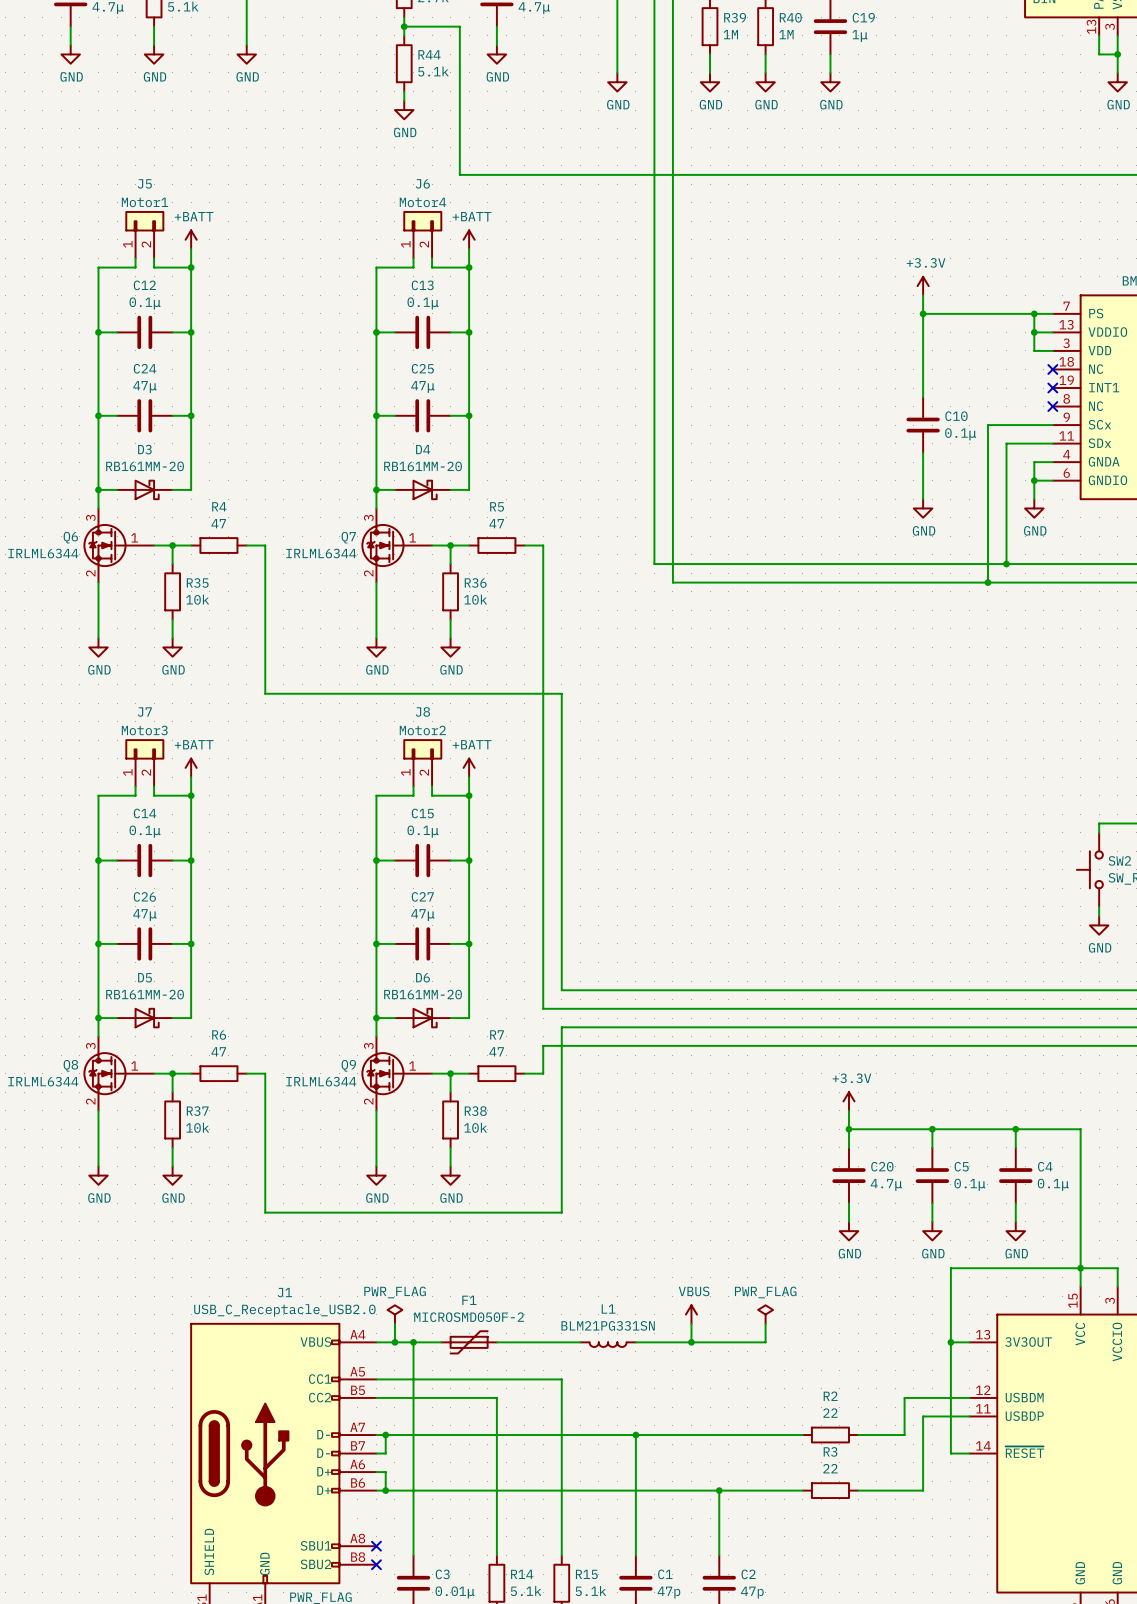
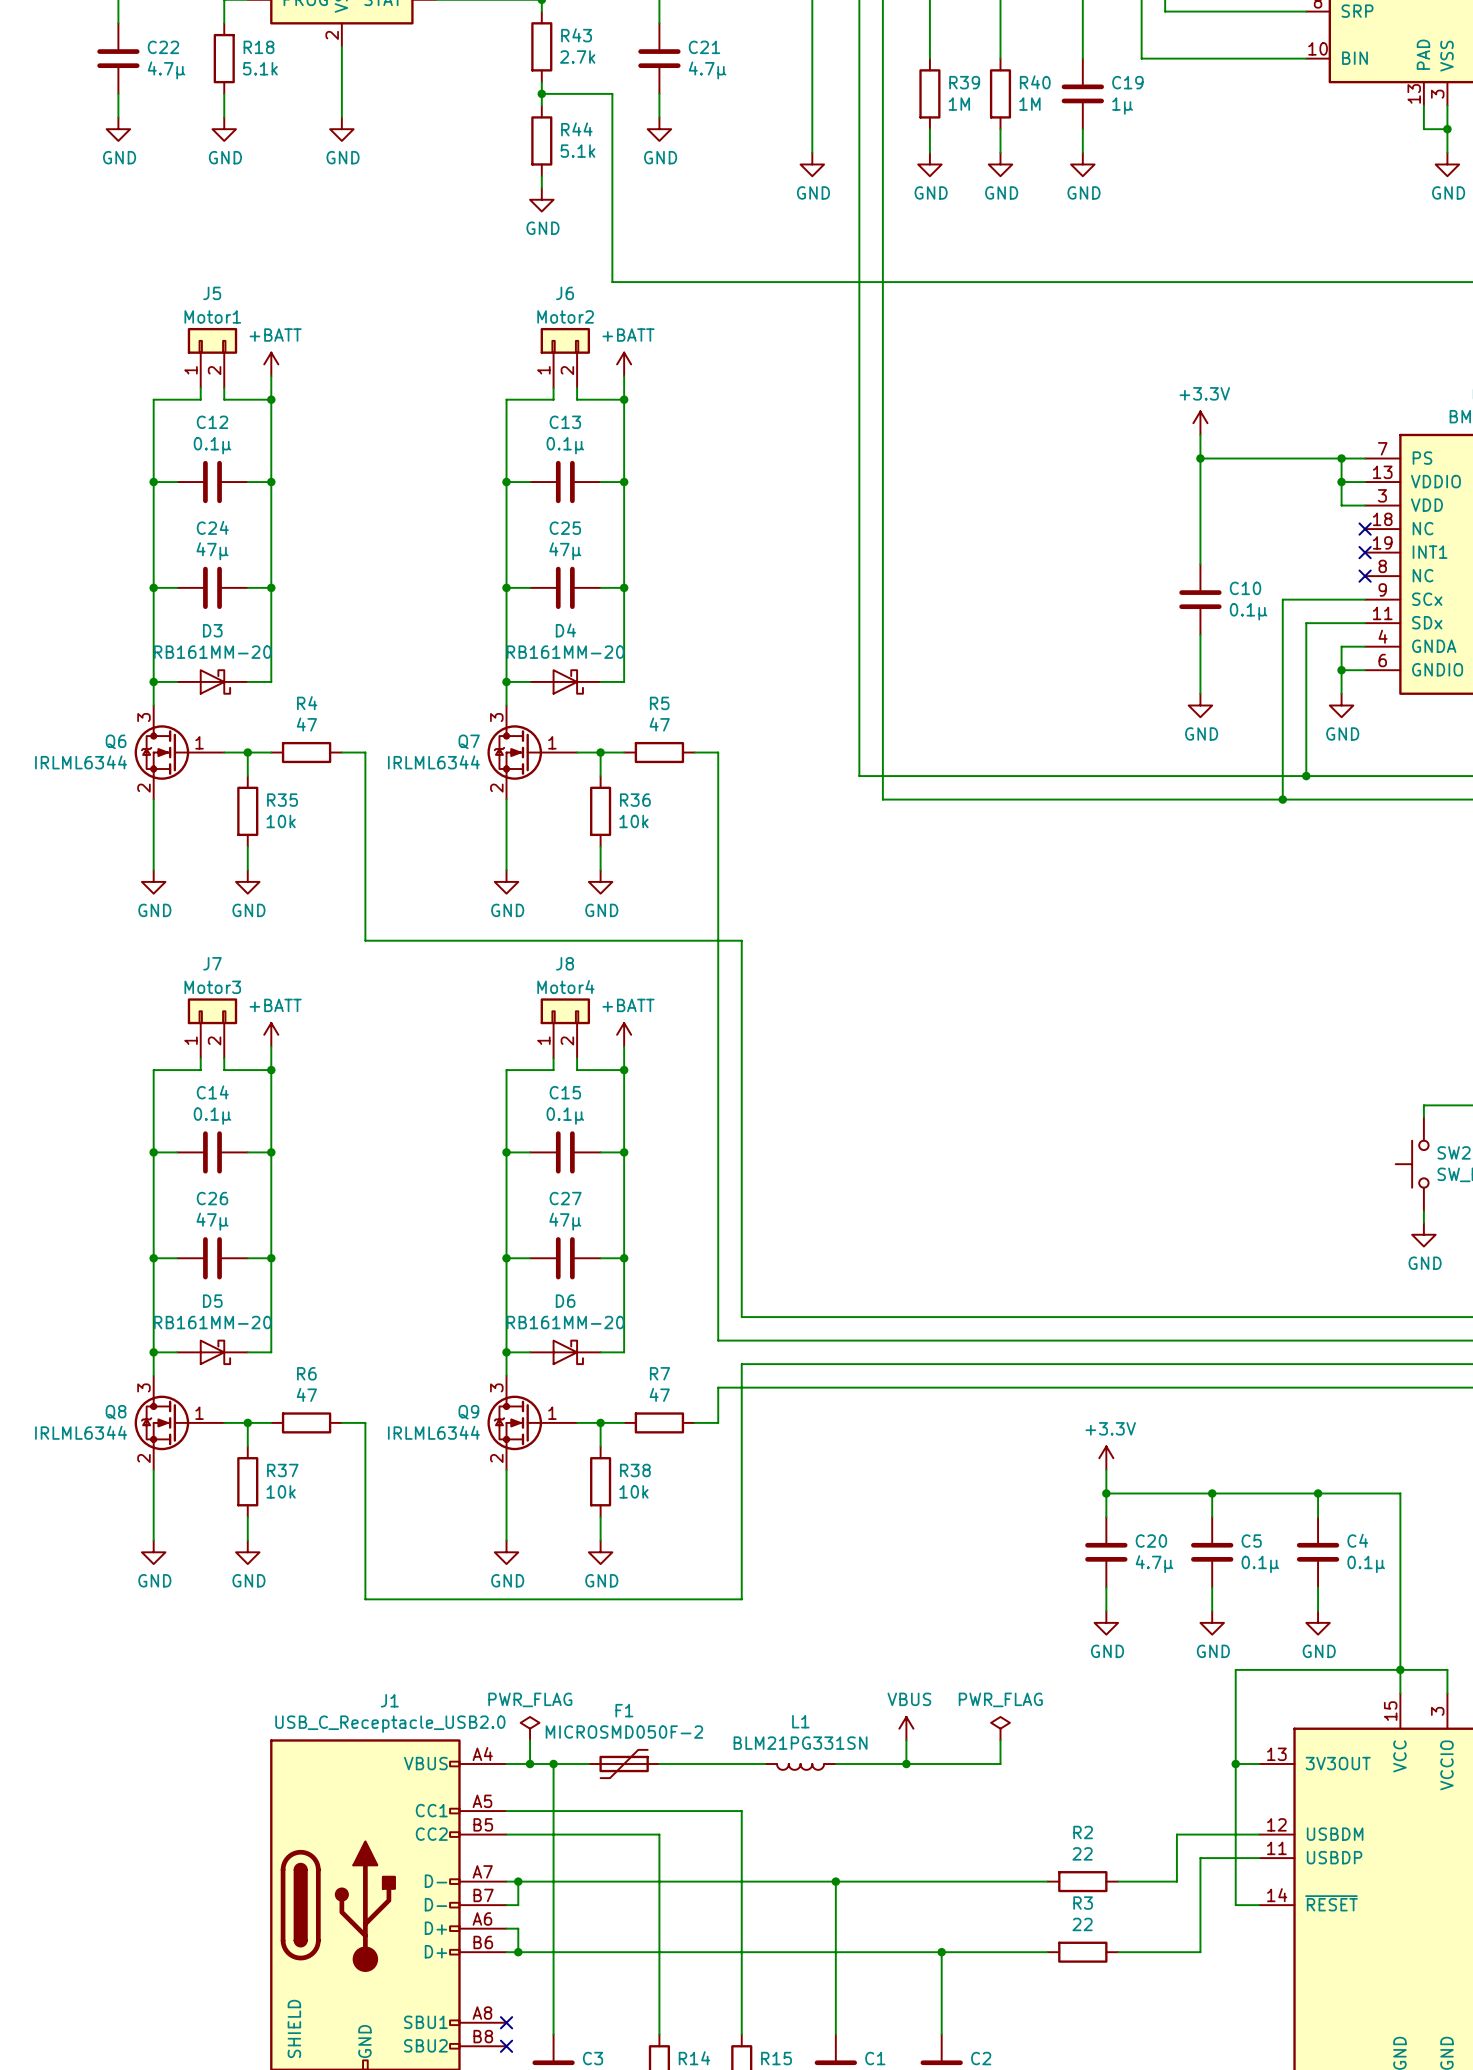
J6 value: Motor4 (422, 202) -> Motor2 (565, 316)
J8 value: Motor2 (422, 730) -> Motor4 (565, 987)

